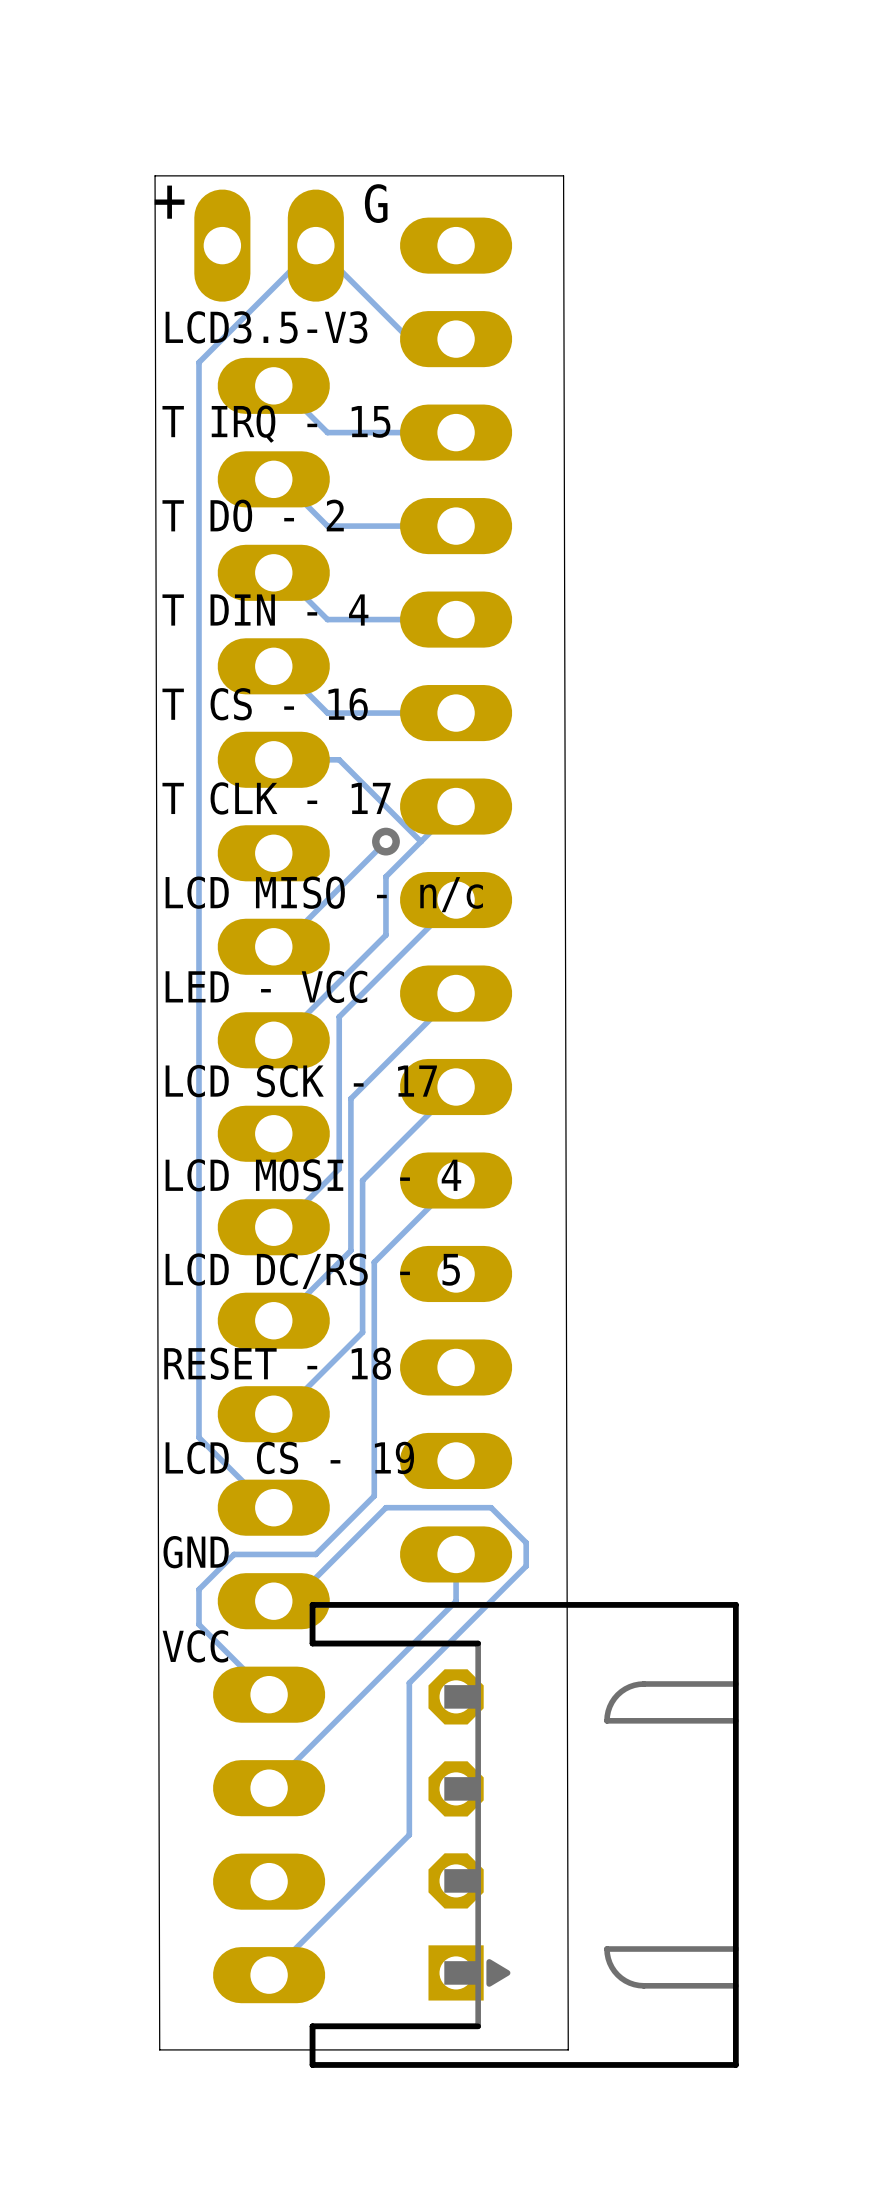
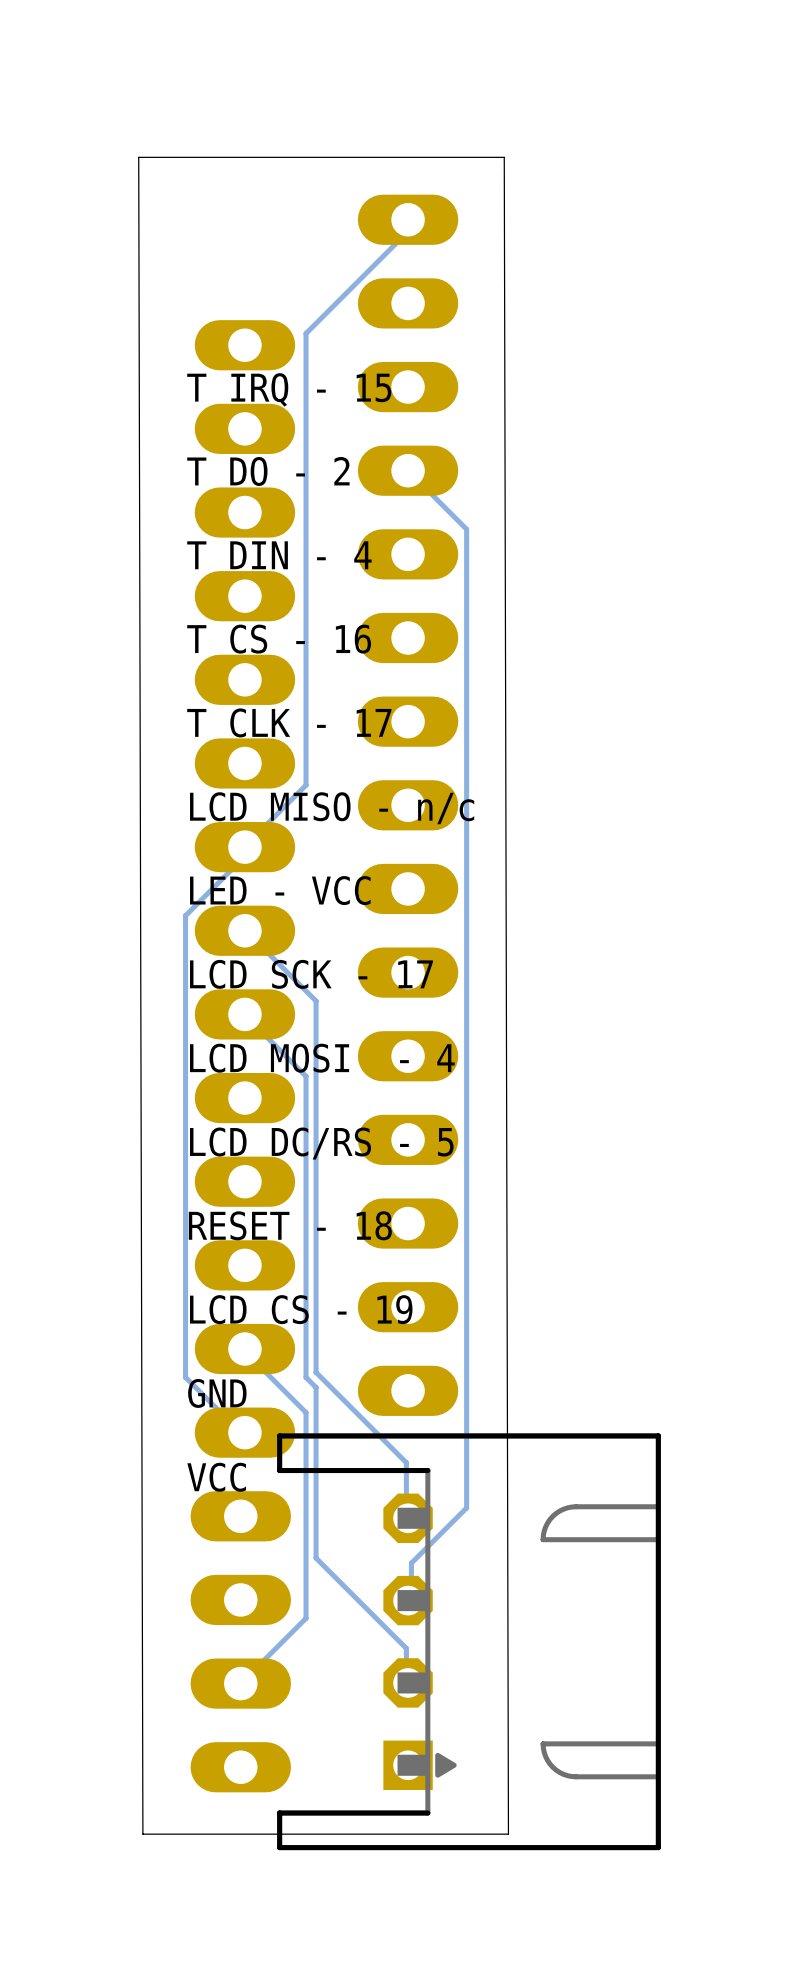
text: + (169, 202) -> none
text: G (376, 203) -> none
part: (269, 245) -> none
text: LCD3.5-V3 (266, 327) -> none
track: (456, 339) (409, 339) (315, 245) (198, 362) (198, 1437) (269, 1507) (273, 1507) -> (240, 1683) (306, 1618) (306, 1412) (245, 1352) (244, 1349)
track: (273, 385) (280, 385) (327, 432) (456, 432) -> none
text position: T IRQ - 15 (276, 424) -> T IRQ - 15 (289, 389)
track: (273, 479) (280, 479) (327, 526) (456, 526) -> (408, 1600) (411, 1598) (411, 1563) (466, 1507) (466, 529) (408, 470)
text position: T DO - 2 (253, 515) -> T DO - 2 (268, 471)
track: (273, 572) (280, 572) (327, 619) (456, 619) -> none
text position: T DIN - 4 (265, 610) -> T DIN - 4 (279, 555)
track: (273, 666) (280, 666) (327, 713) (456, 713) -> none
text position: T CS - 16 (265, 704) -> T CS - 16 (279, 639)
track: (273, 759) (339, 759) (421, 841) -> none
text position: T CLK - 17 (276, 798) -> T CLK - 17 (289, 722)
track: (456, 806) (385, 876) (385, 935) (280, 1040) (274, 1040) -> (408, 1518) (406, 1517) (406, 1462) (316, 1372) (316, 1001) (245, 930)
track: (385, 841) (280, 946) (273, 946) -> none
via: (385, 841) -> none
text position: LCD MISO - n/c (324, 894) -> LCD MISO - n/c (332, 808)
track: (456, 900) (339, 1016) (339, 1168) (280, 1227) (273, 1227) -> none
text position: LED - VCC (266, 986) -> LED - VCC (280, 890)
track: (456, 993) (350, 1098) (350, 1250) (280, 1320) (273, 1320) -> none
text position: LCD SCK - 17 (301, 1081) -> LCD SCK - 17 (311, 974)
track: (456, 1087) (362, 1180) (362, 1332) (280, 1414) (273, 1414) -> none
track: none -> (244, 1014) (306, 1076) (306, 1377) (316, 1387) (316, 1558) (406, 1648) (408, 1682)
text position: LCD MOSI - 4 (313, 1175) -> LCD MOSI - 4 (322, 1058)
track: (456, 1180) (374, 1262) (374, 1496) (315, 1554) (234, 1554) (198, 1589) (198, 1624) (269, 1694) -> none
text position: LCD DC/RS - 5 (312, 1271) -> LCD DC/RS - 5 (321, 1143)
text position: RESET - 18 (277, 1363) -> RESET - 18 (290, 1225)
text position: LCD CS - 19 (289, 1457) -> LCD CS - 19 (301, 1309)
text position: GND (196, 1552) -> GND (217, 1393)
track: (456, 1554) (456, 1601) (269, 1788) -> none
track: (273, 1601) (292, 1601) (385, 1507) (491, 1507) (526, 1542) (526, 1566) (409, 1682) (409, 1834) (269, 1975) -> (244, 1432) (240, 1432) (185, 1377) (185, 915) (240, 860) (240, 850) (306, 785) (306, 333) (406, 233) (408, 219)
text position: VCC (195, 1646) -> VCC (216, 1477)

